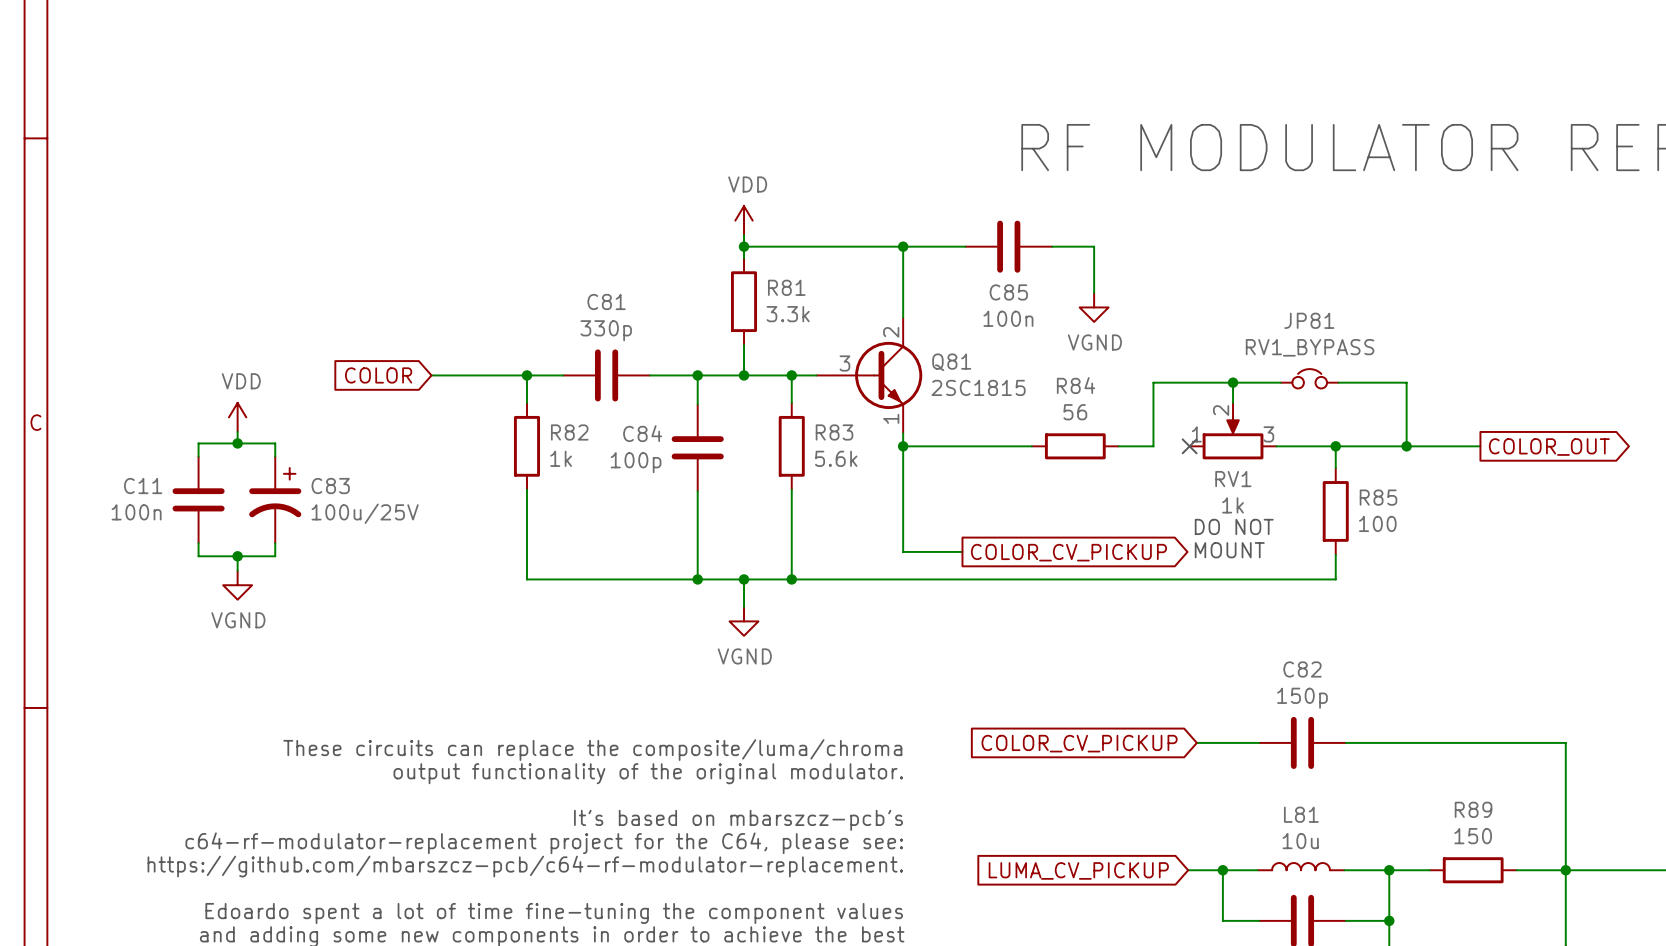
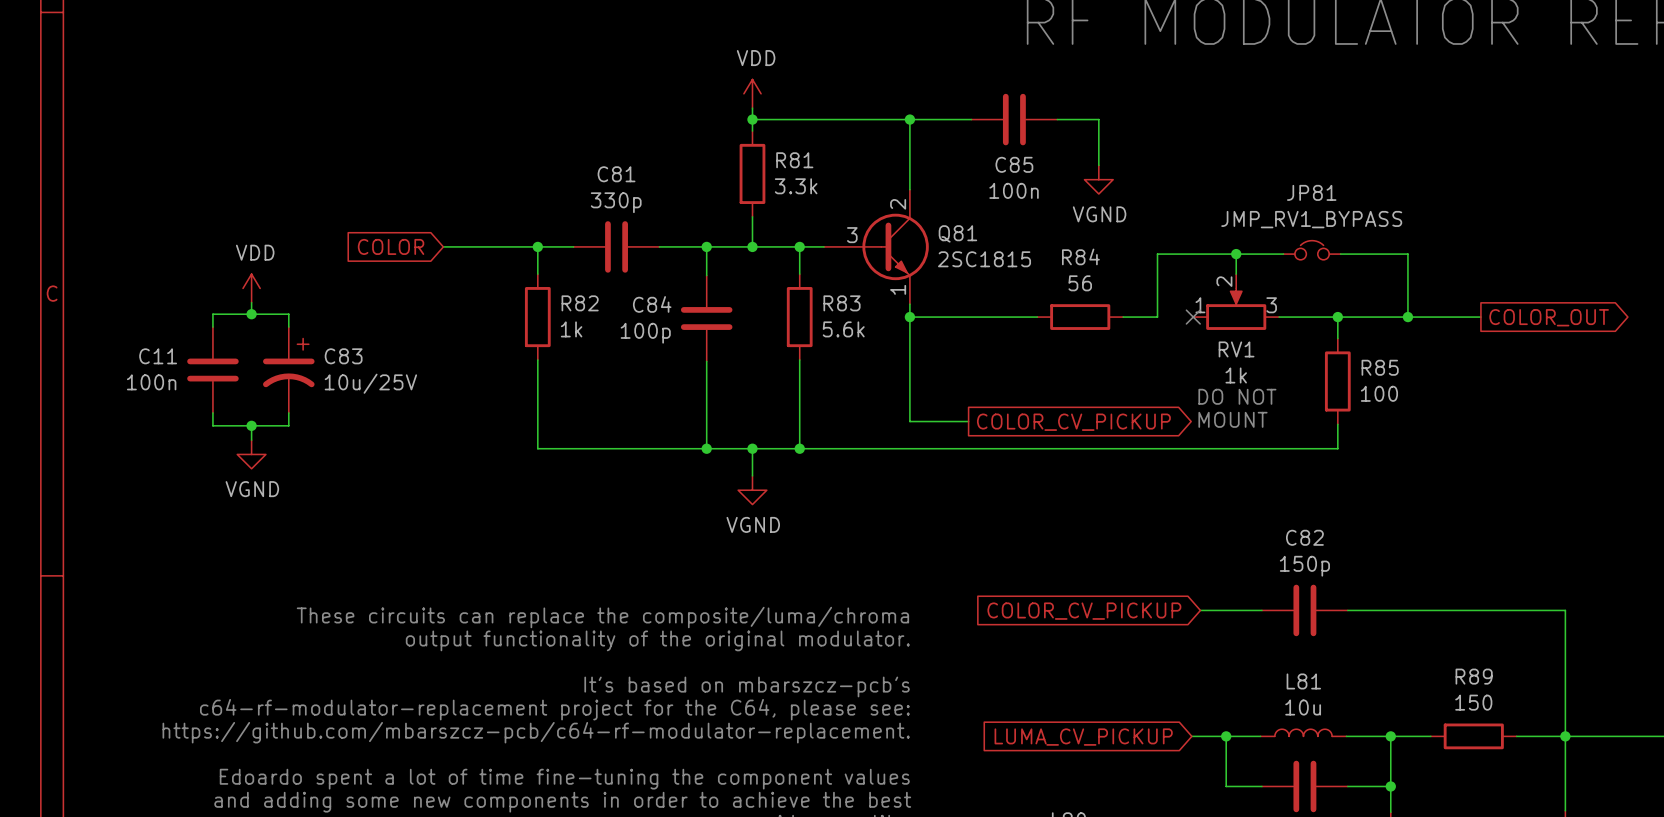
JP81 value: RV1_BYPASS (1310, 347) -> JMP_RV1_BYPASS (1311, 219)
C83 value: 100u/25V (365, 513) -> 10u/25V (370, 383)

